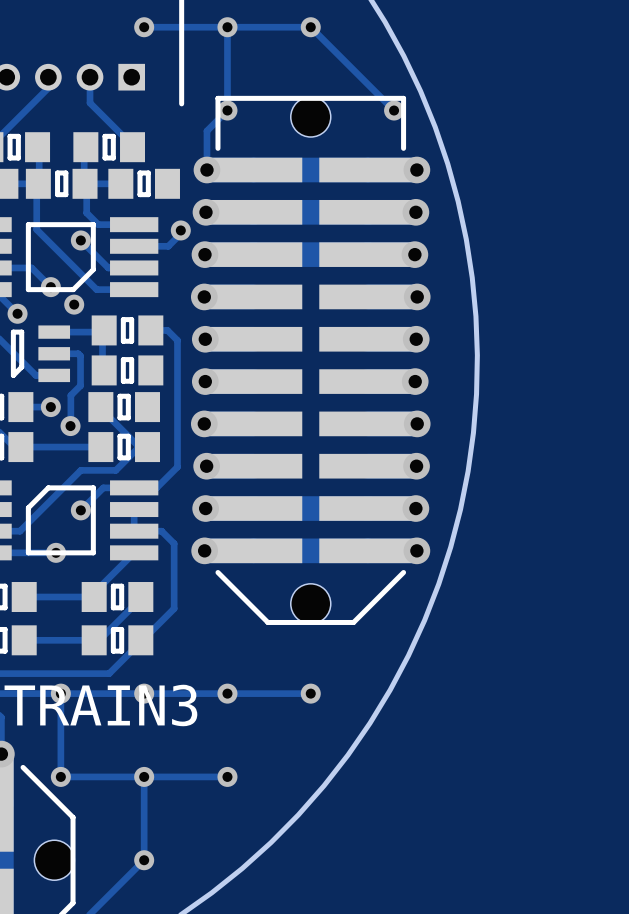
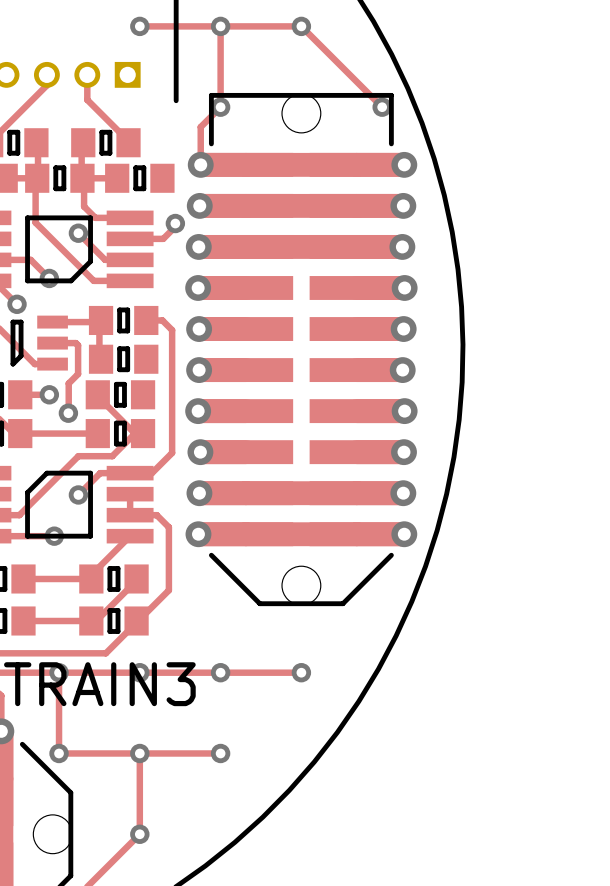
via: (74, 304) -> none

